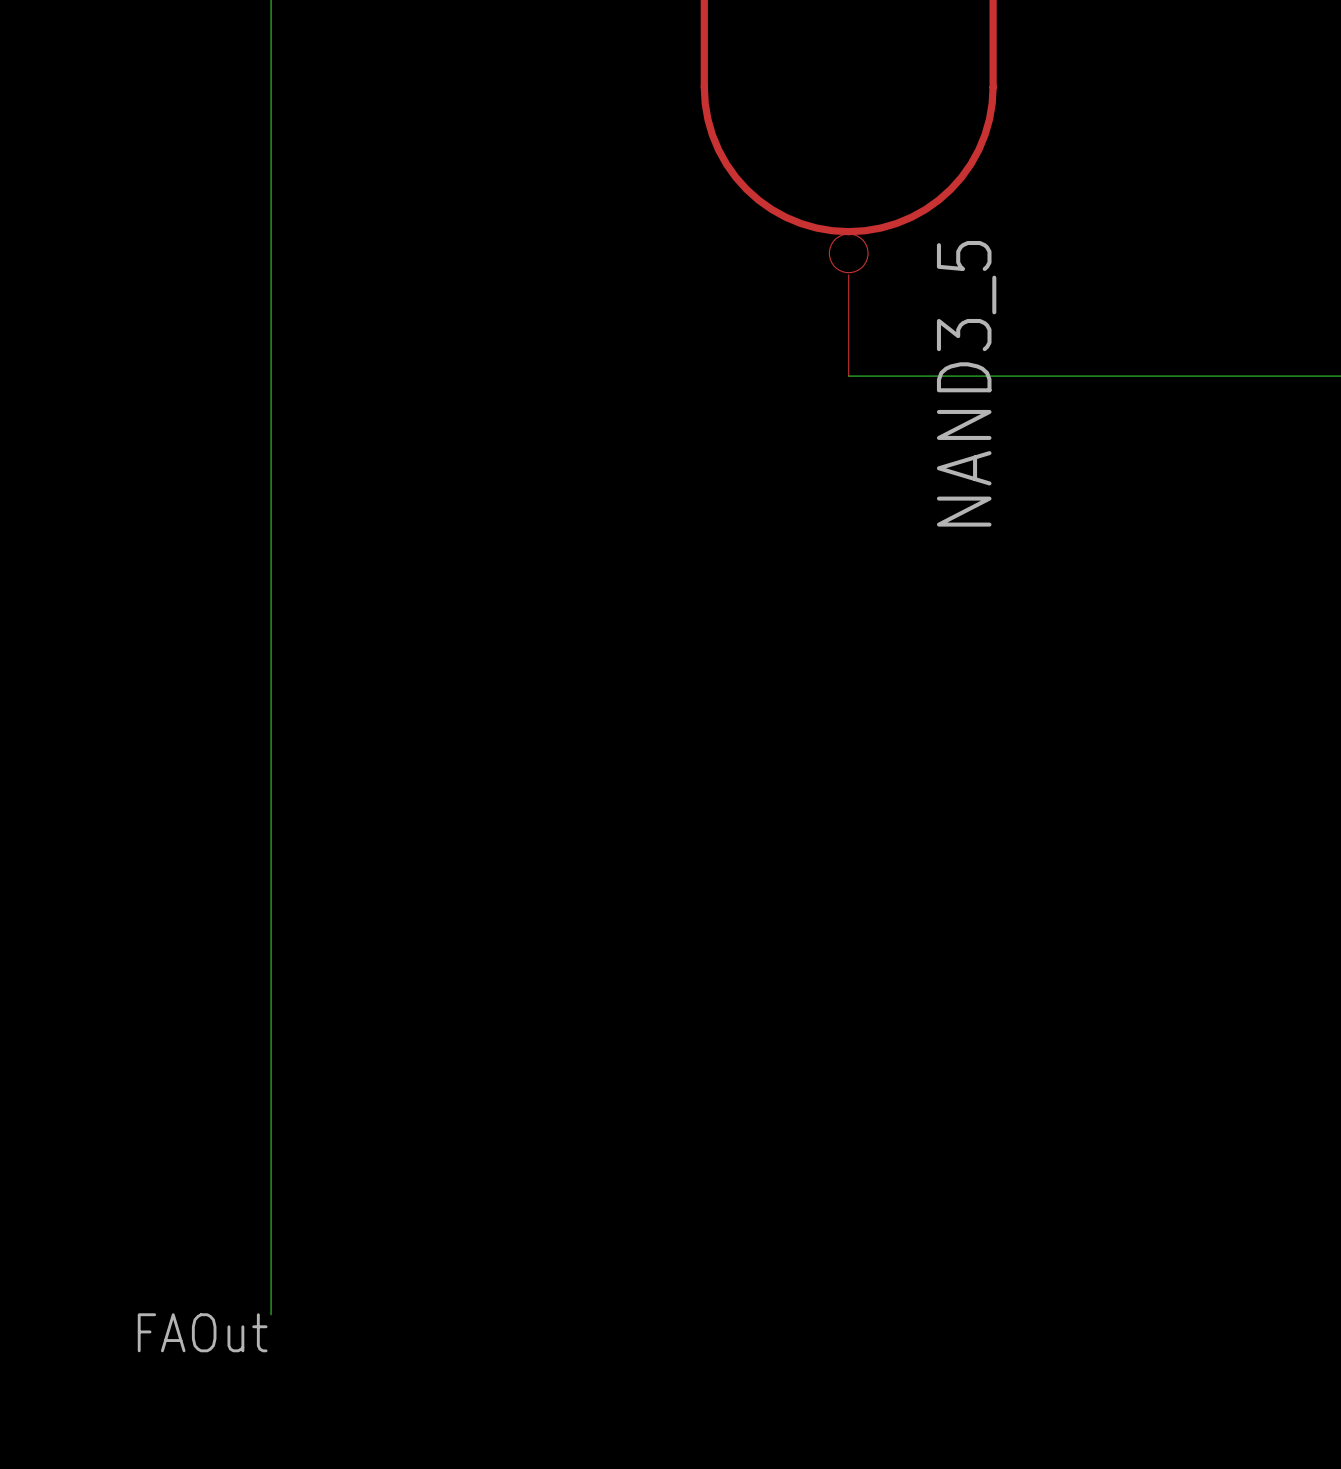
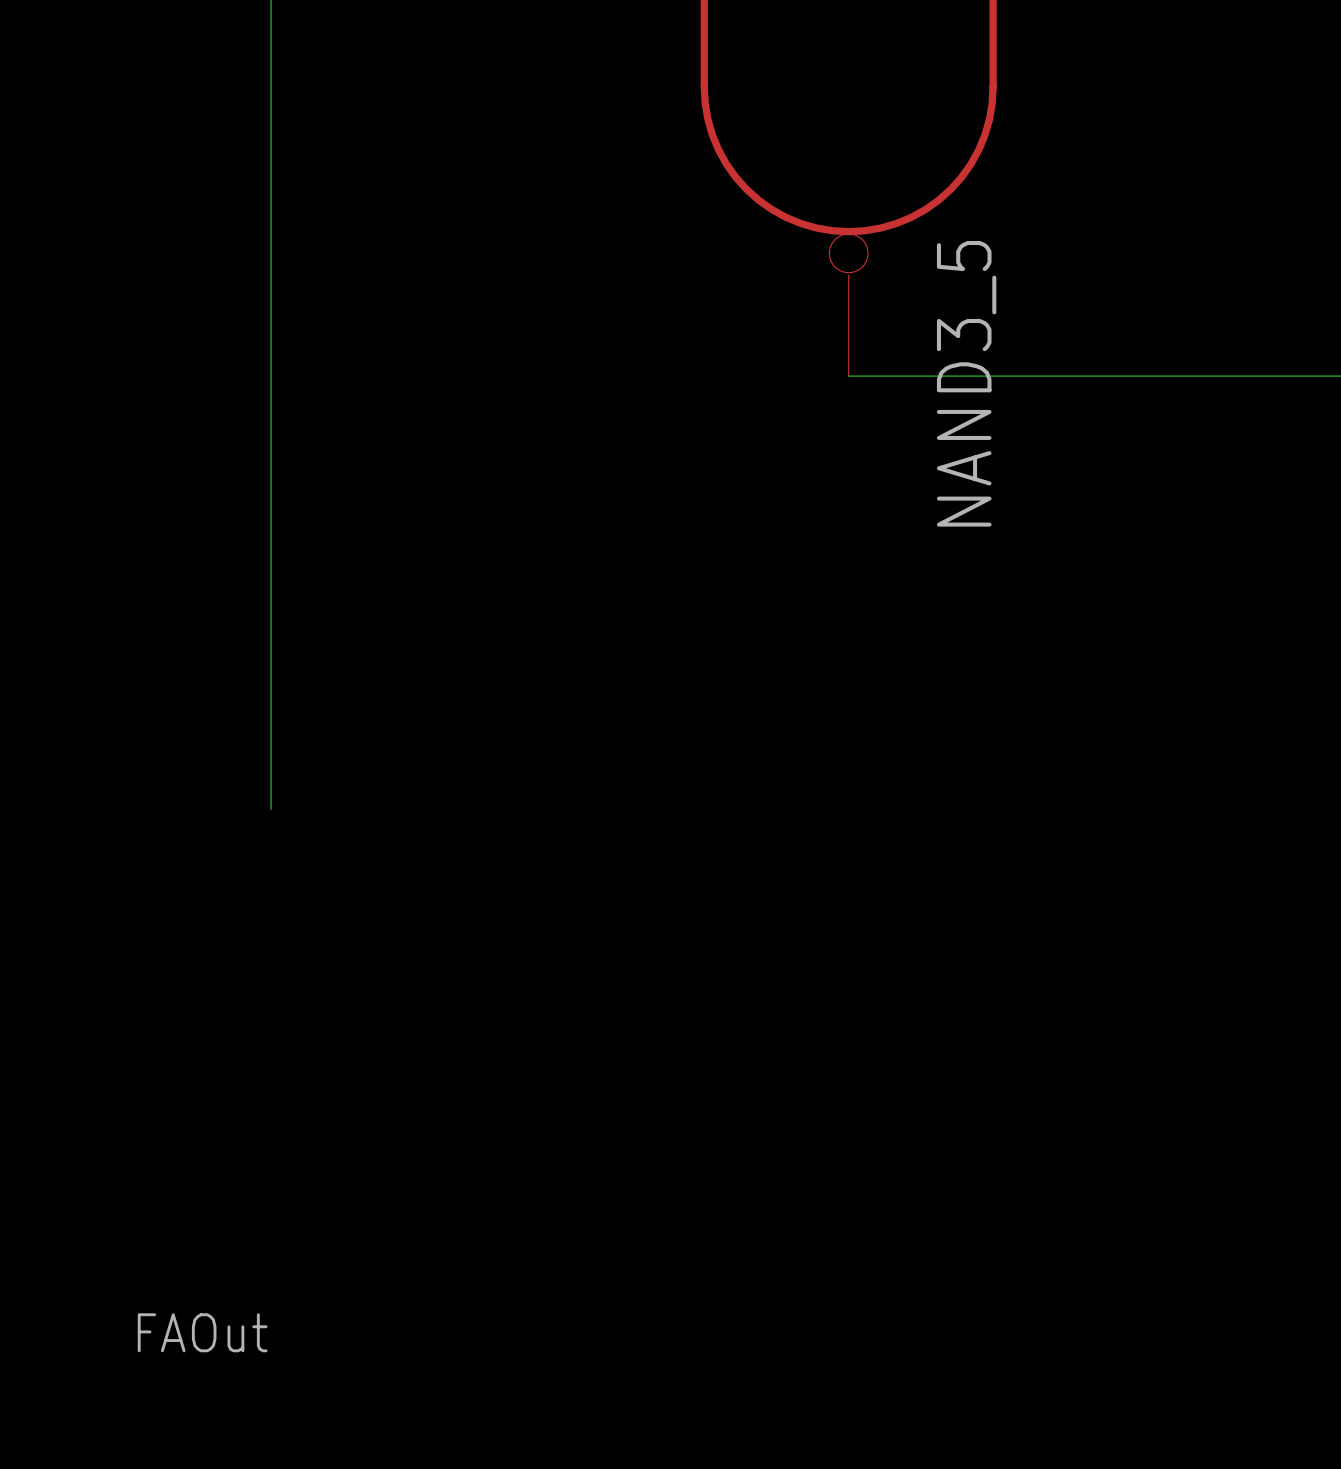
wire: (271, 809) (271, 1314) -> none

